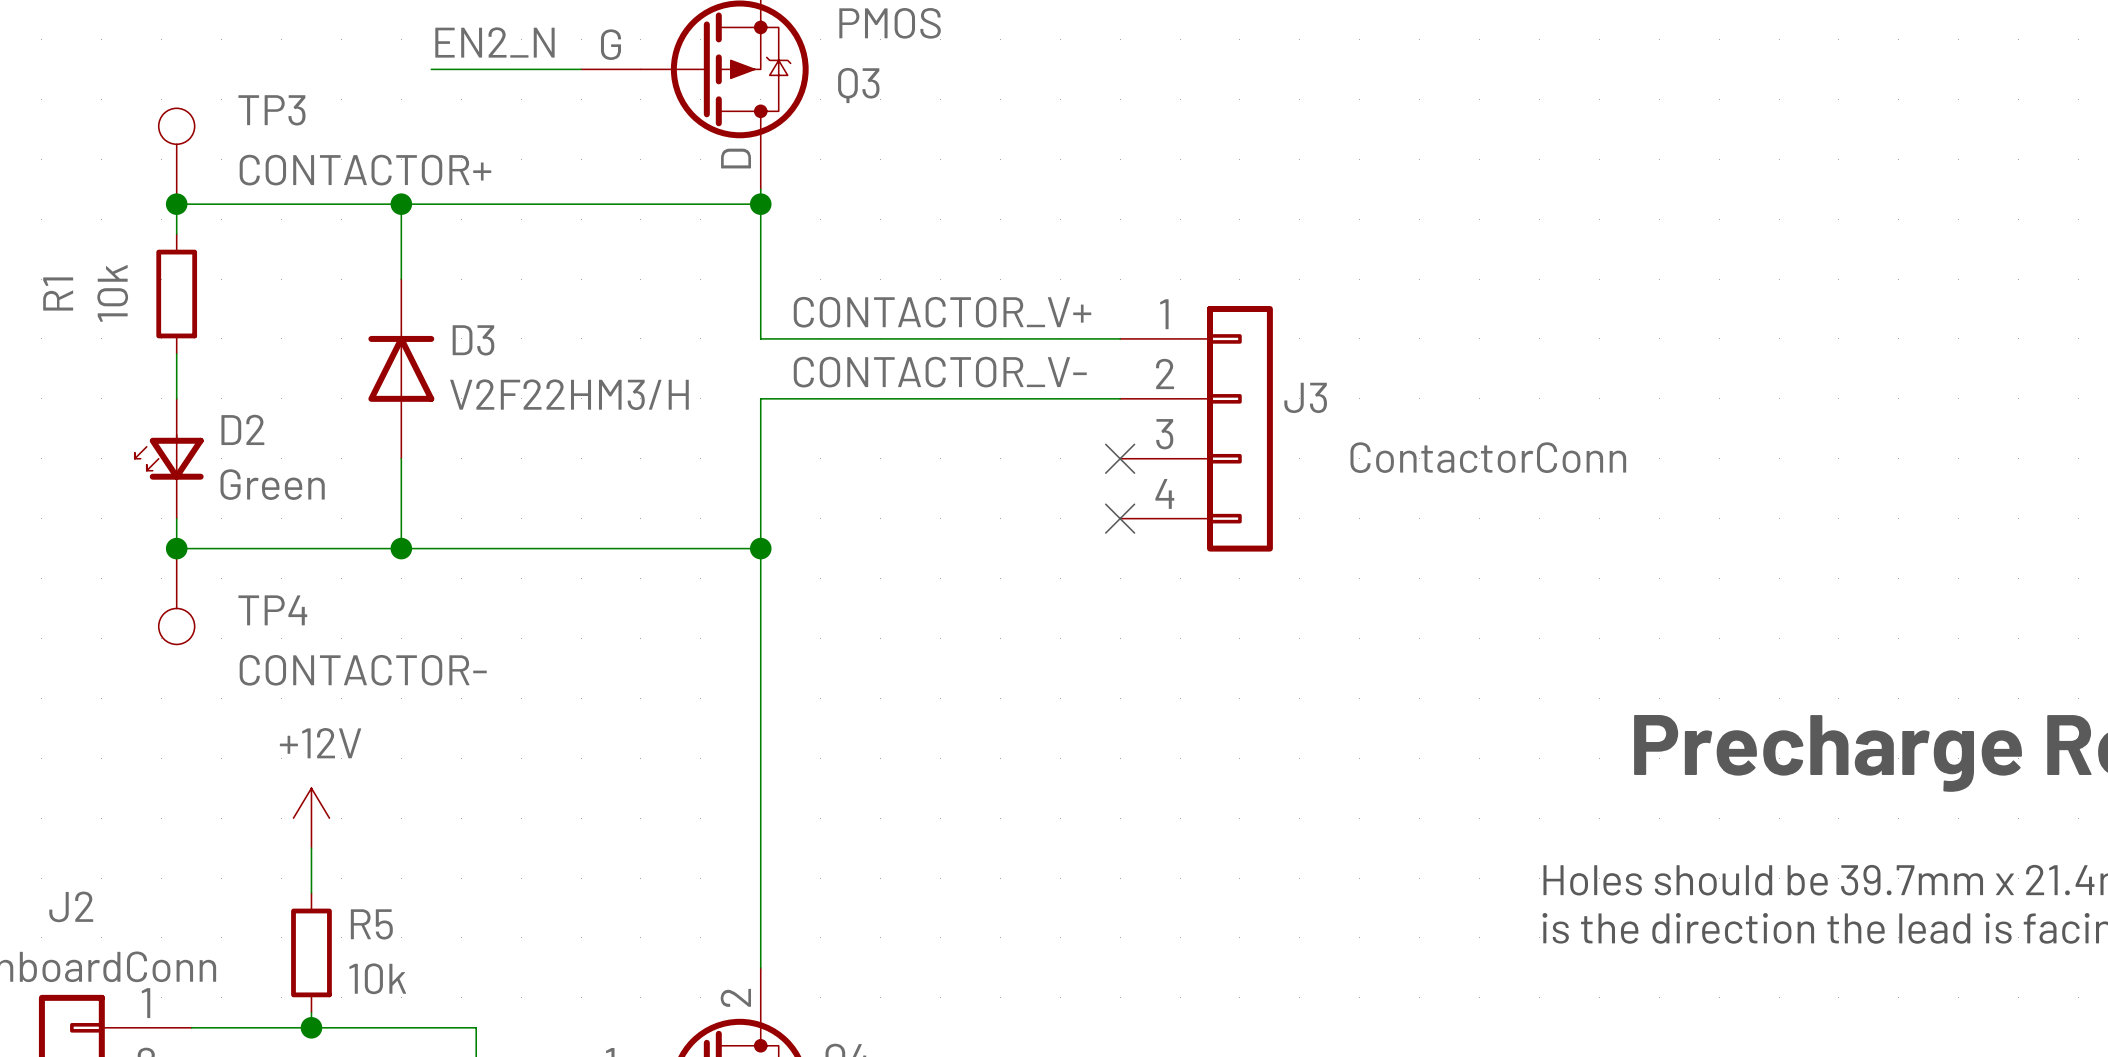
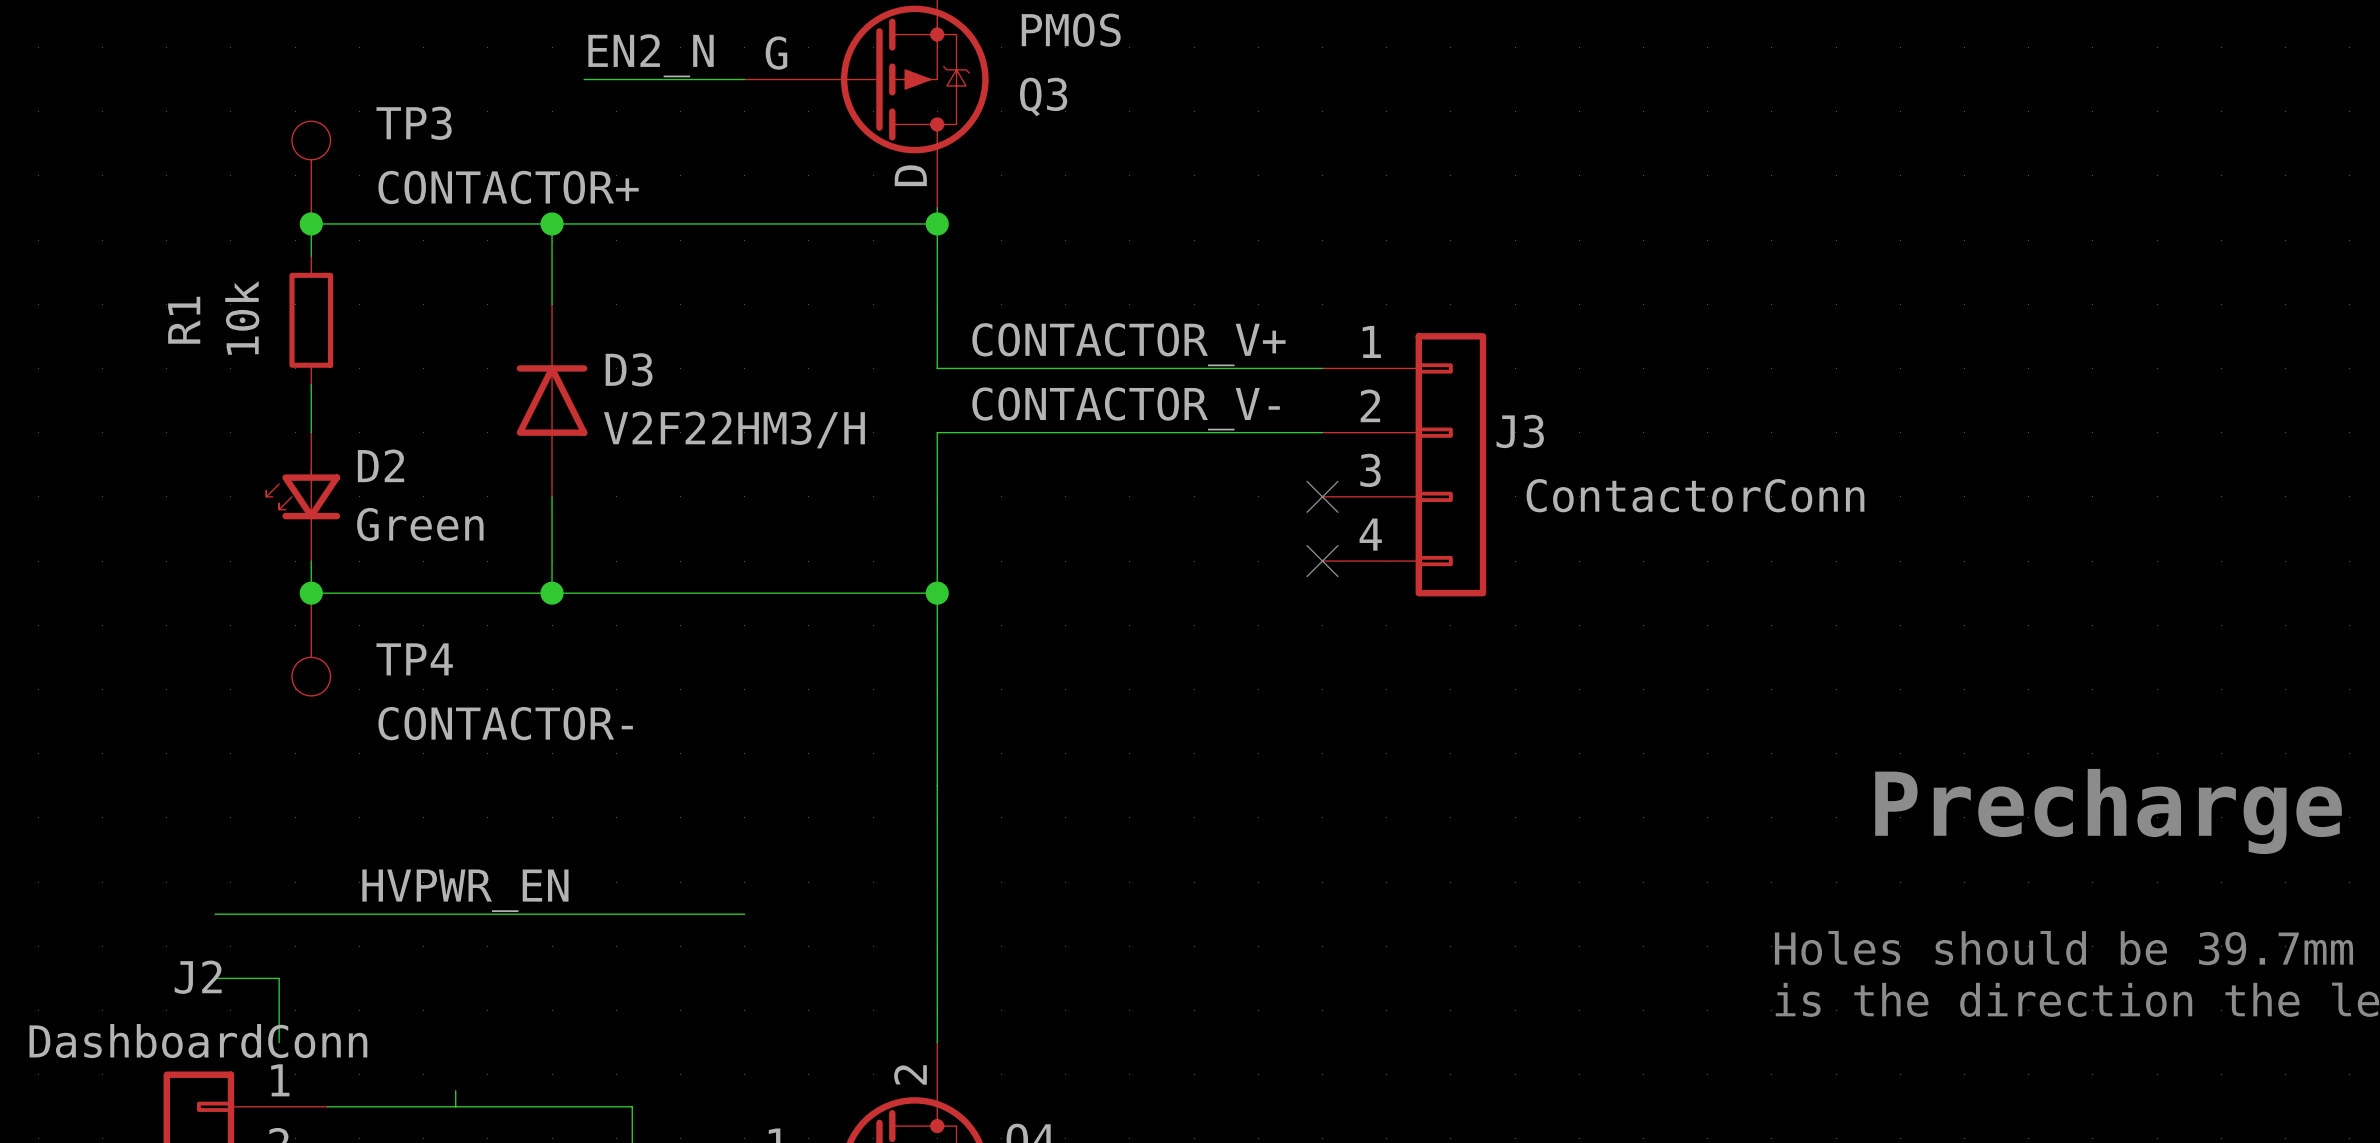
power symbol: +12V (311, 818) -> none
label: none -> HVPWR_EN (465, 890)
wire: none -> (214, 914) (744, 914)
wire: (311, 848) (311, 893) -> none
wire: none -> (214, 978) (279, 978) (279, 1042)
R5: 10k (311, 952) -> none
junction: (311, 1027) -> none

